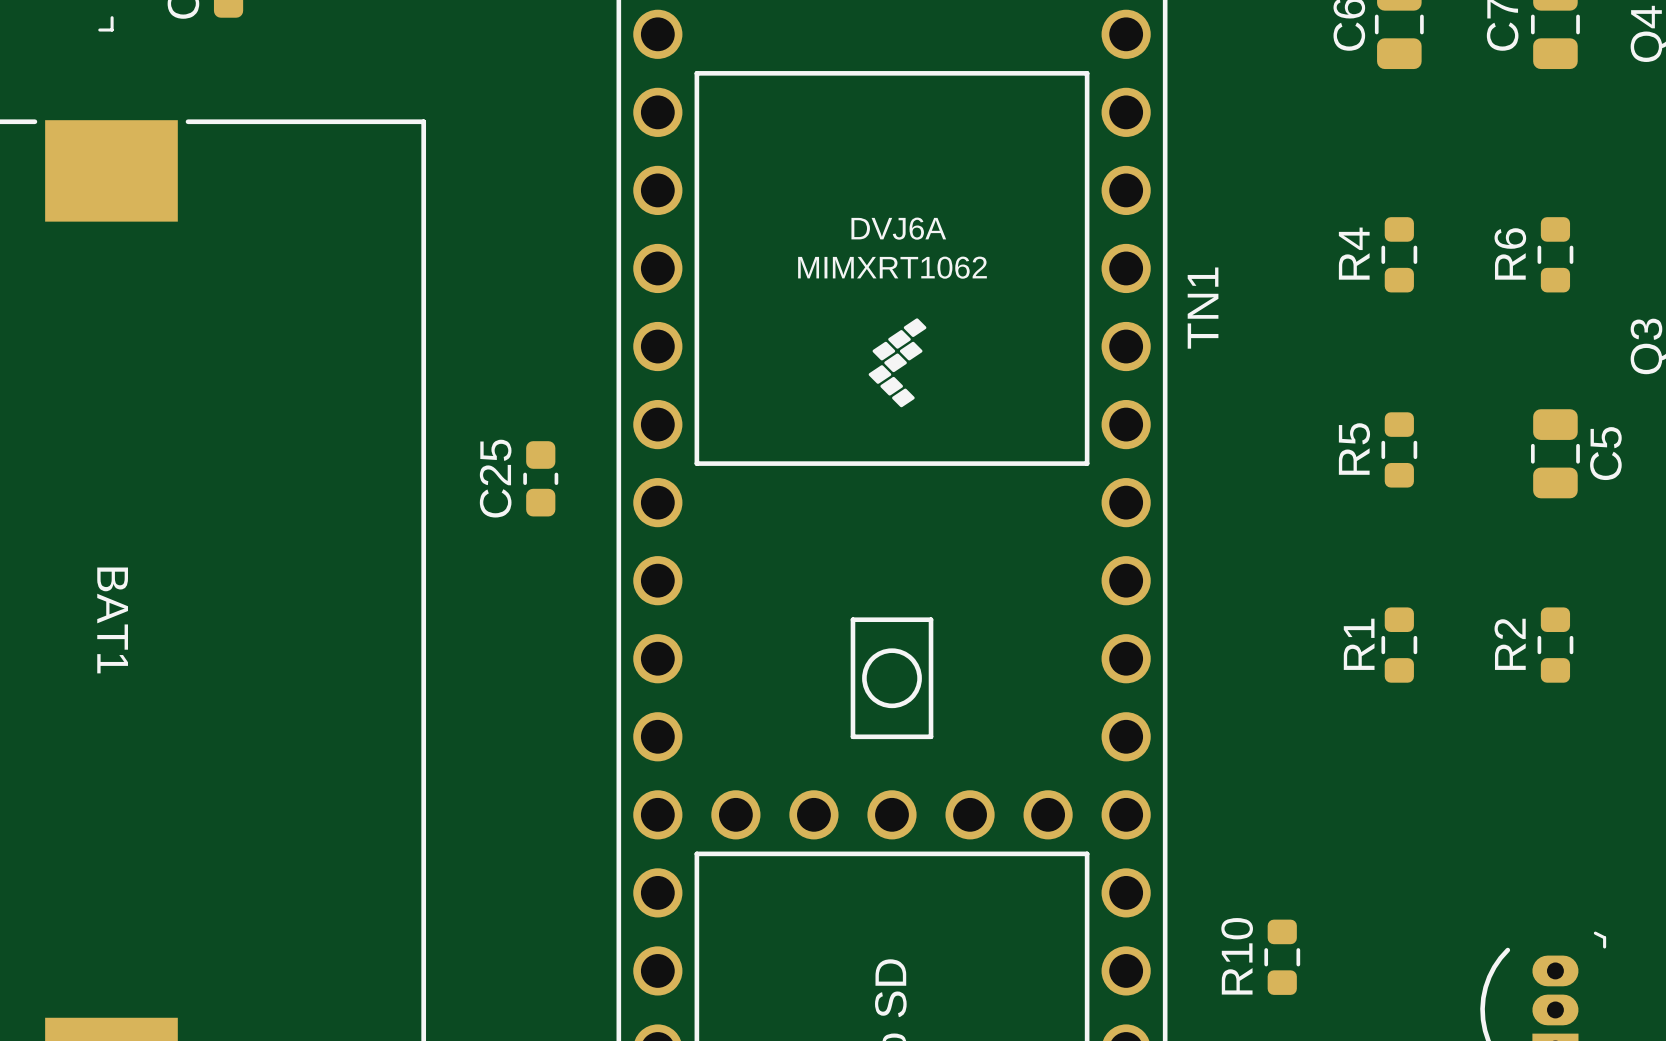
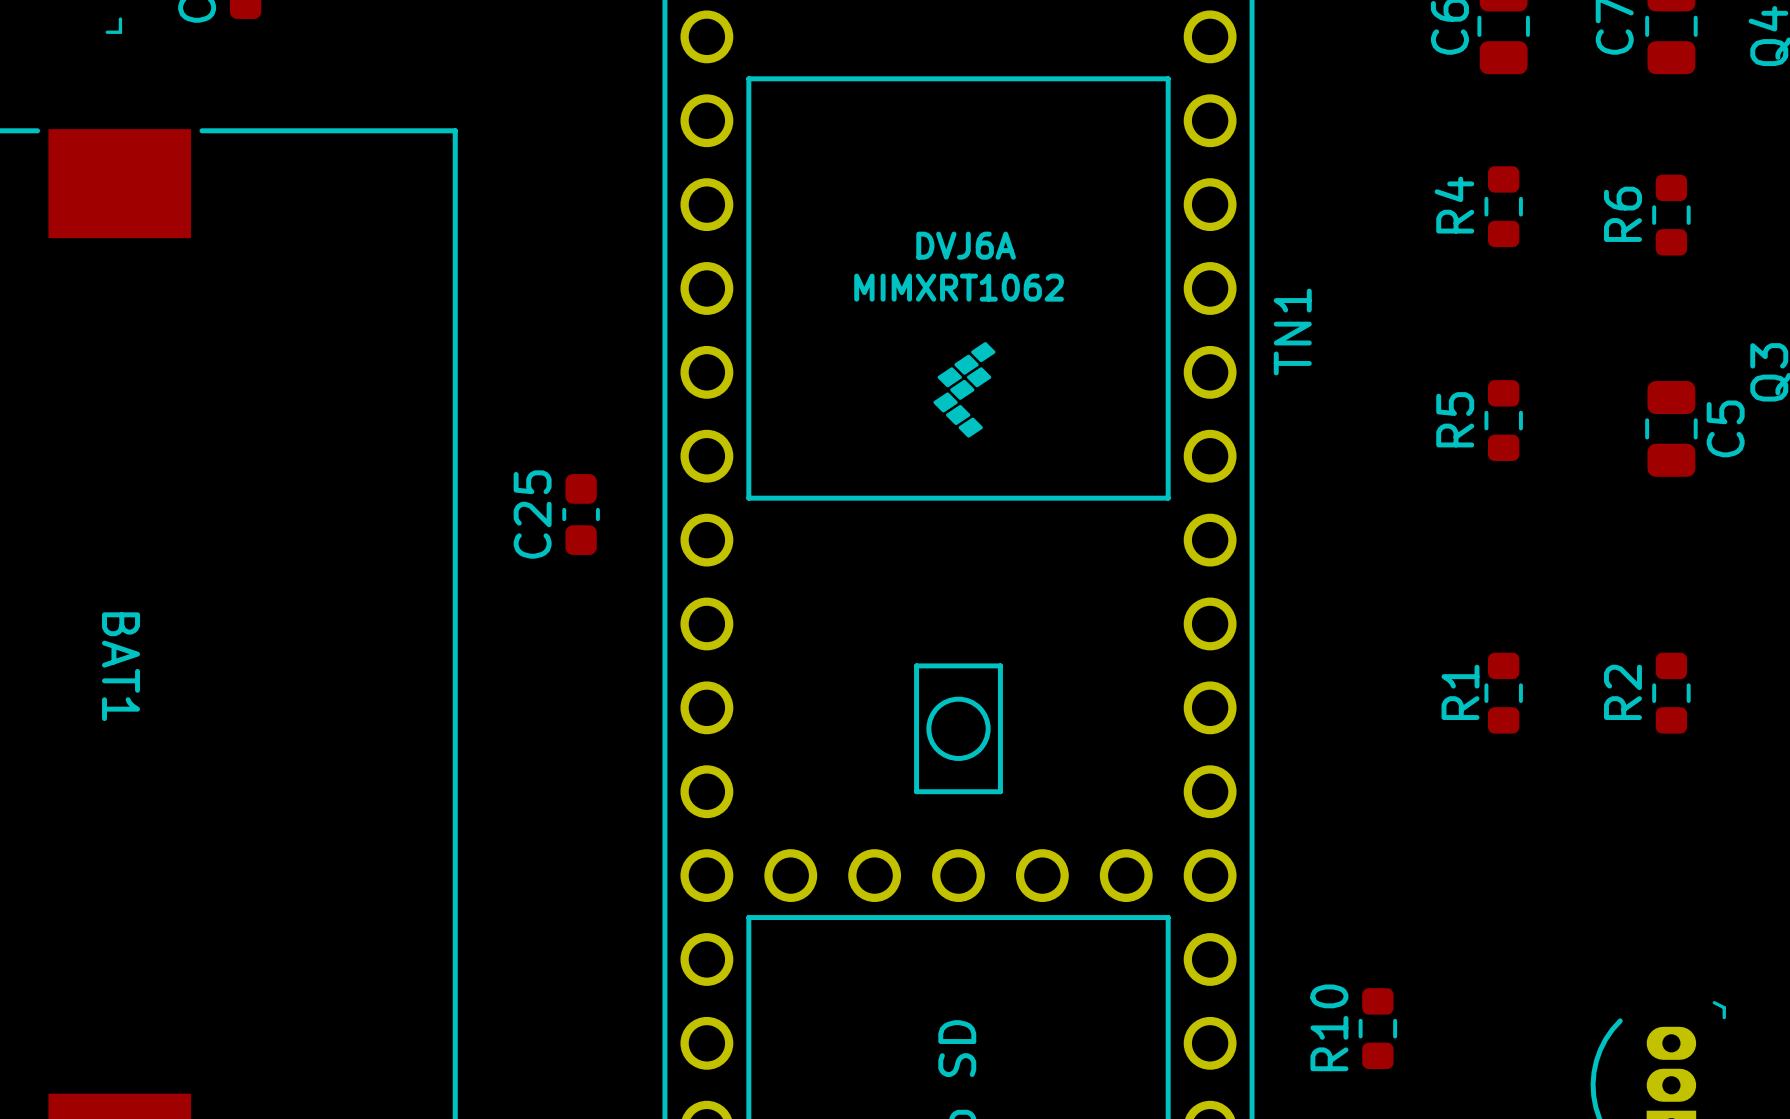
R4 position: (1399, 254) -> (1503, 206)
R6 position: (1555, 254) -> (1671, 215)
R5 position: (1399, 449) -> (1503, 420)
C5 position: (1555, 453) -> (1671, 428)

